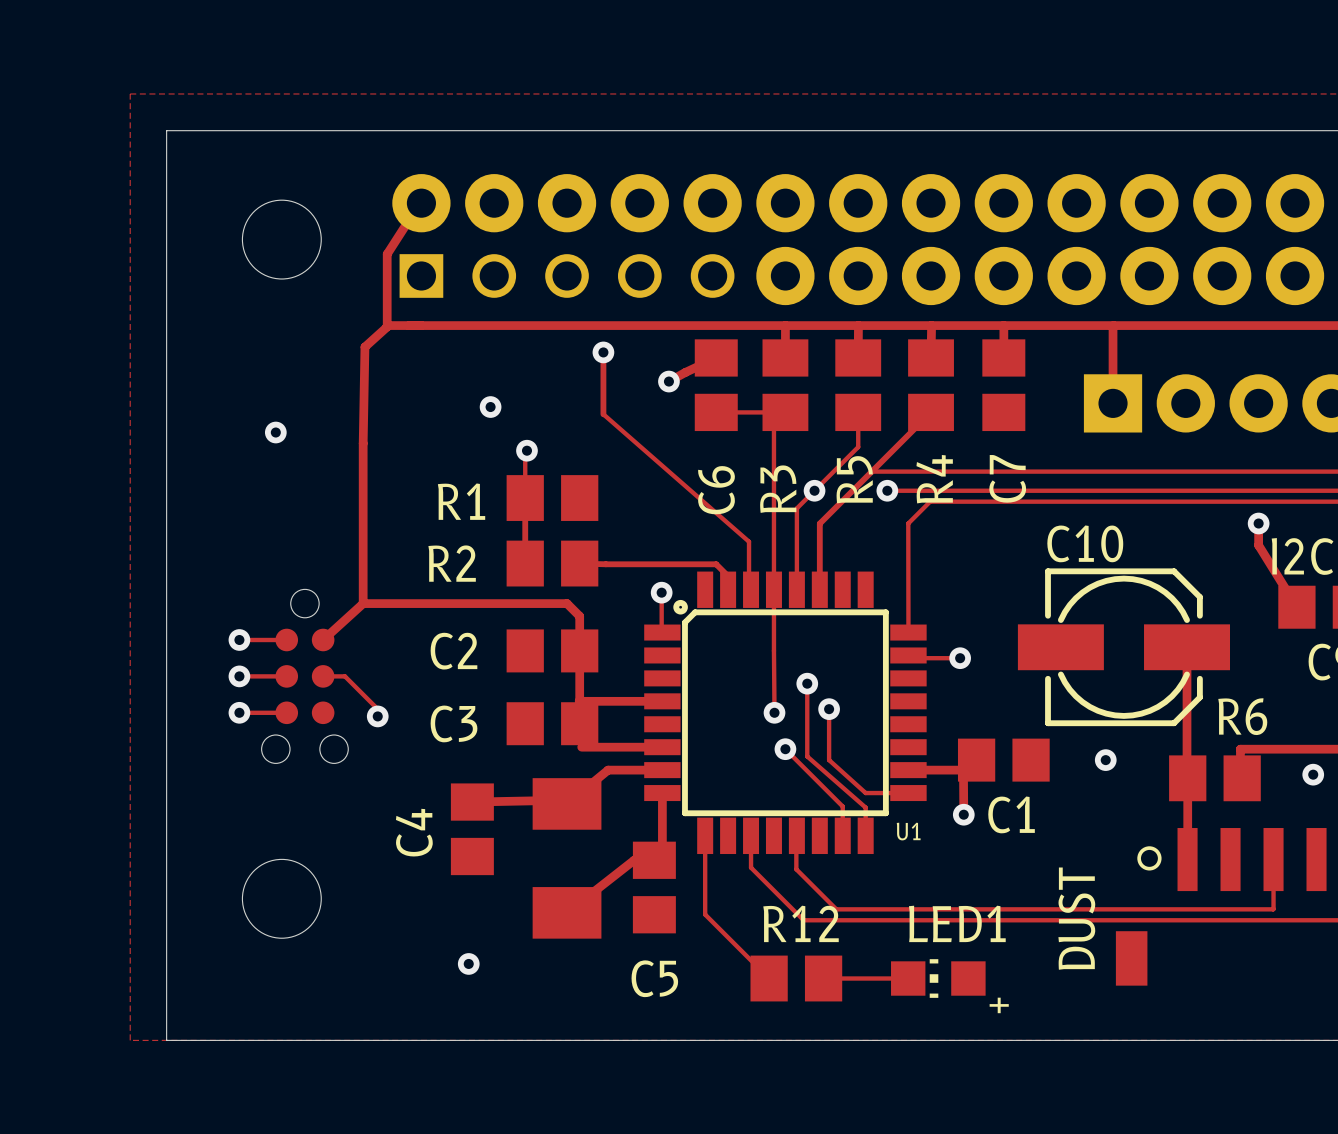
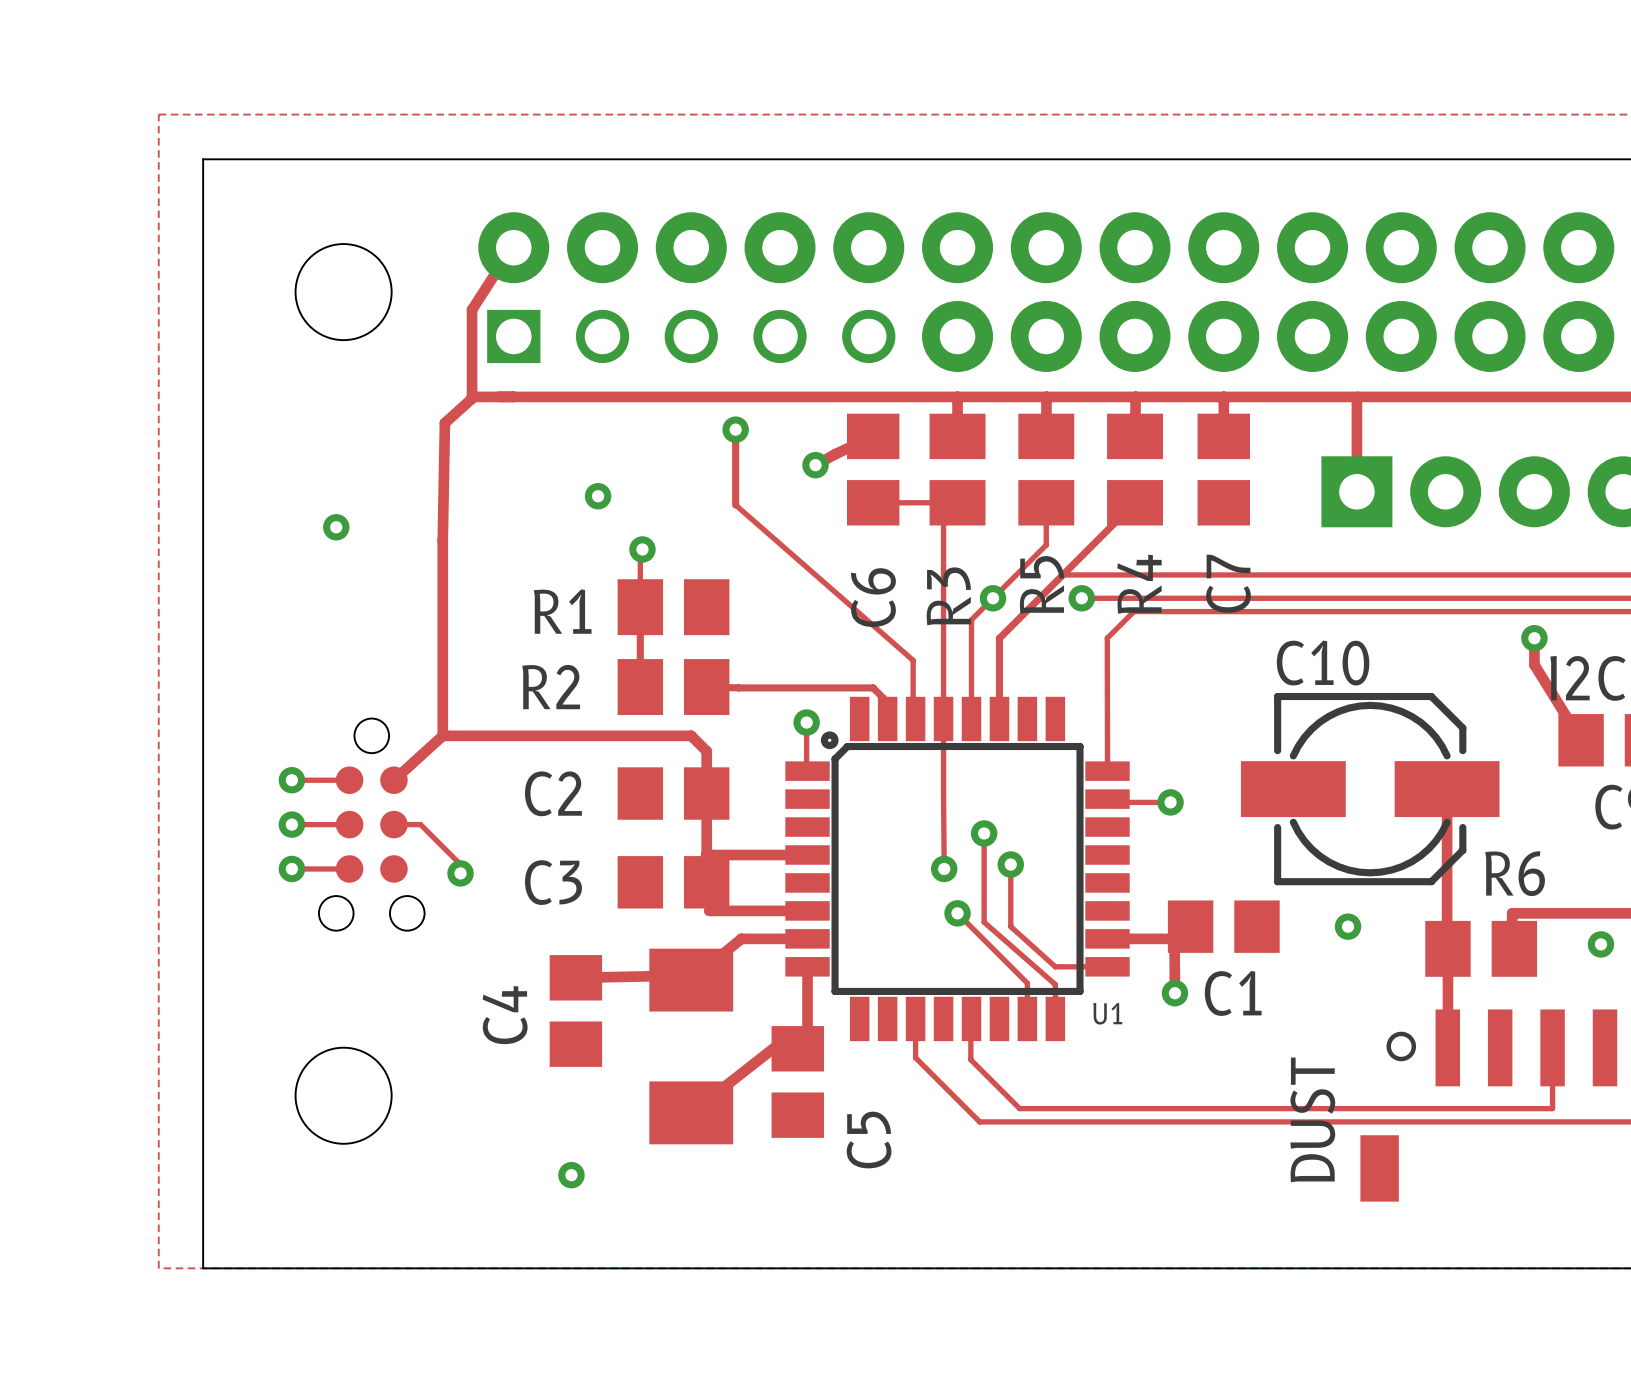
track: (705, 835) (705, 914) (769, 978) -> none
C5 name rotation: 0° (654, 978) -> 90° counterclockwise (869, 1140)
C5 name position: C5 (654, 978) -> C5 (869, 1140)
R12: (796, 978) -> none
track: (823, 978) (908, 978) -> none
LED1: (938, 978) -> none

